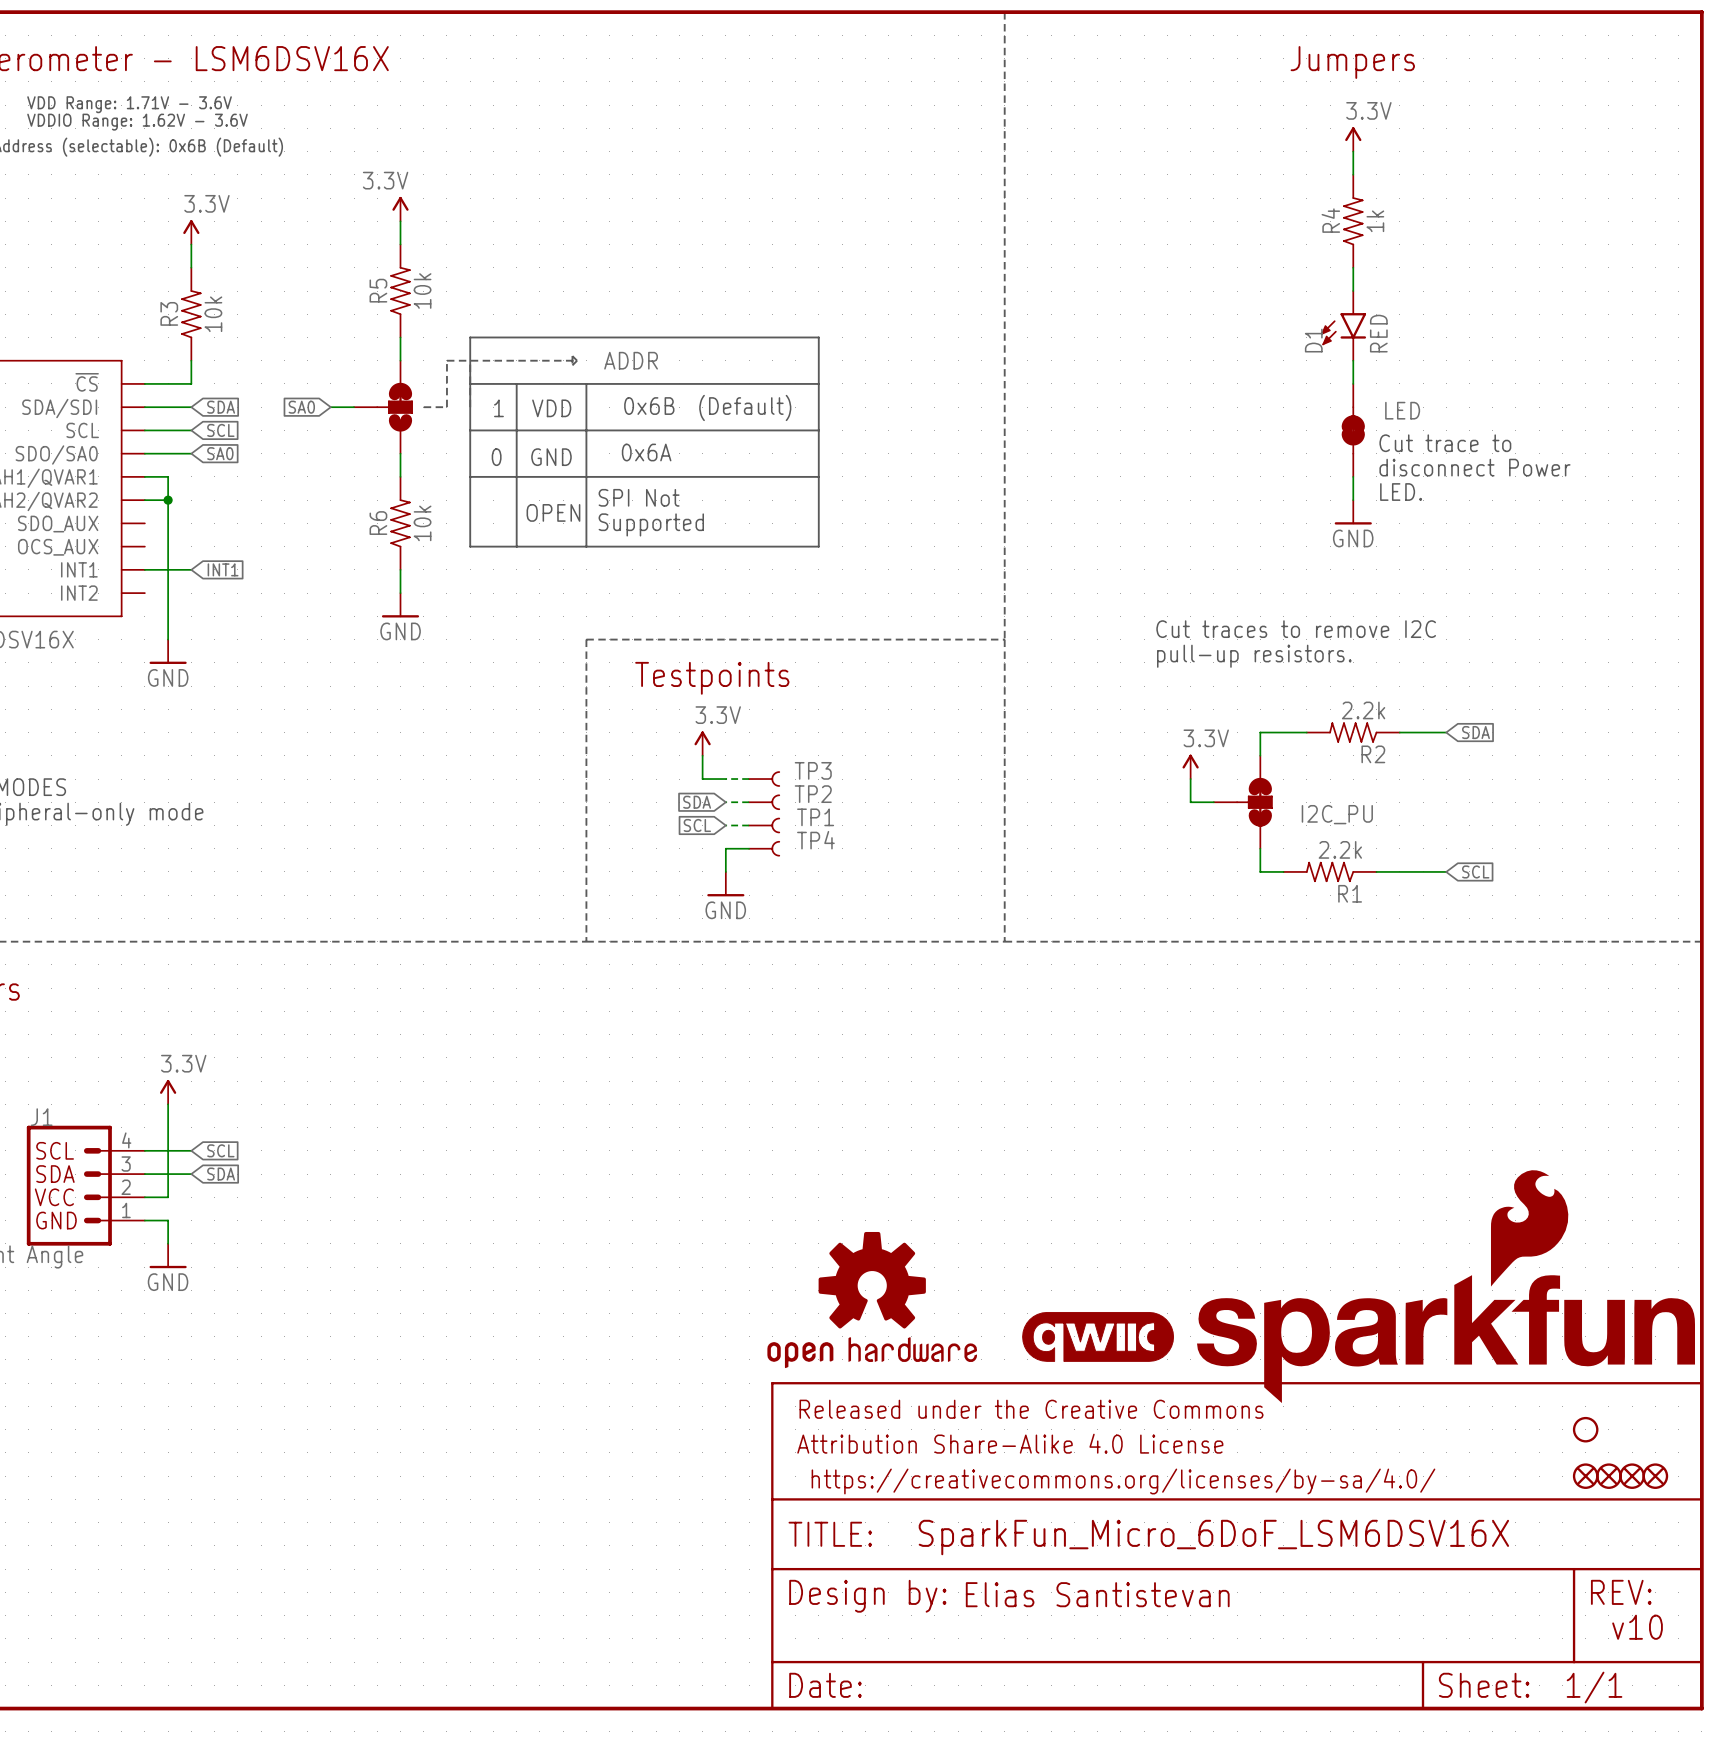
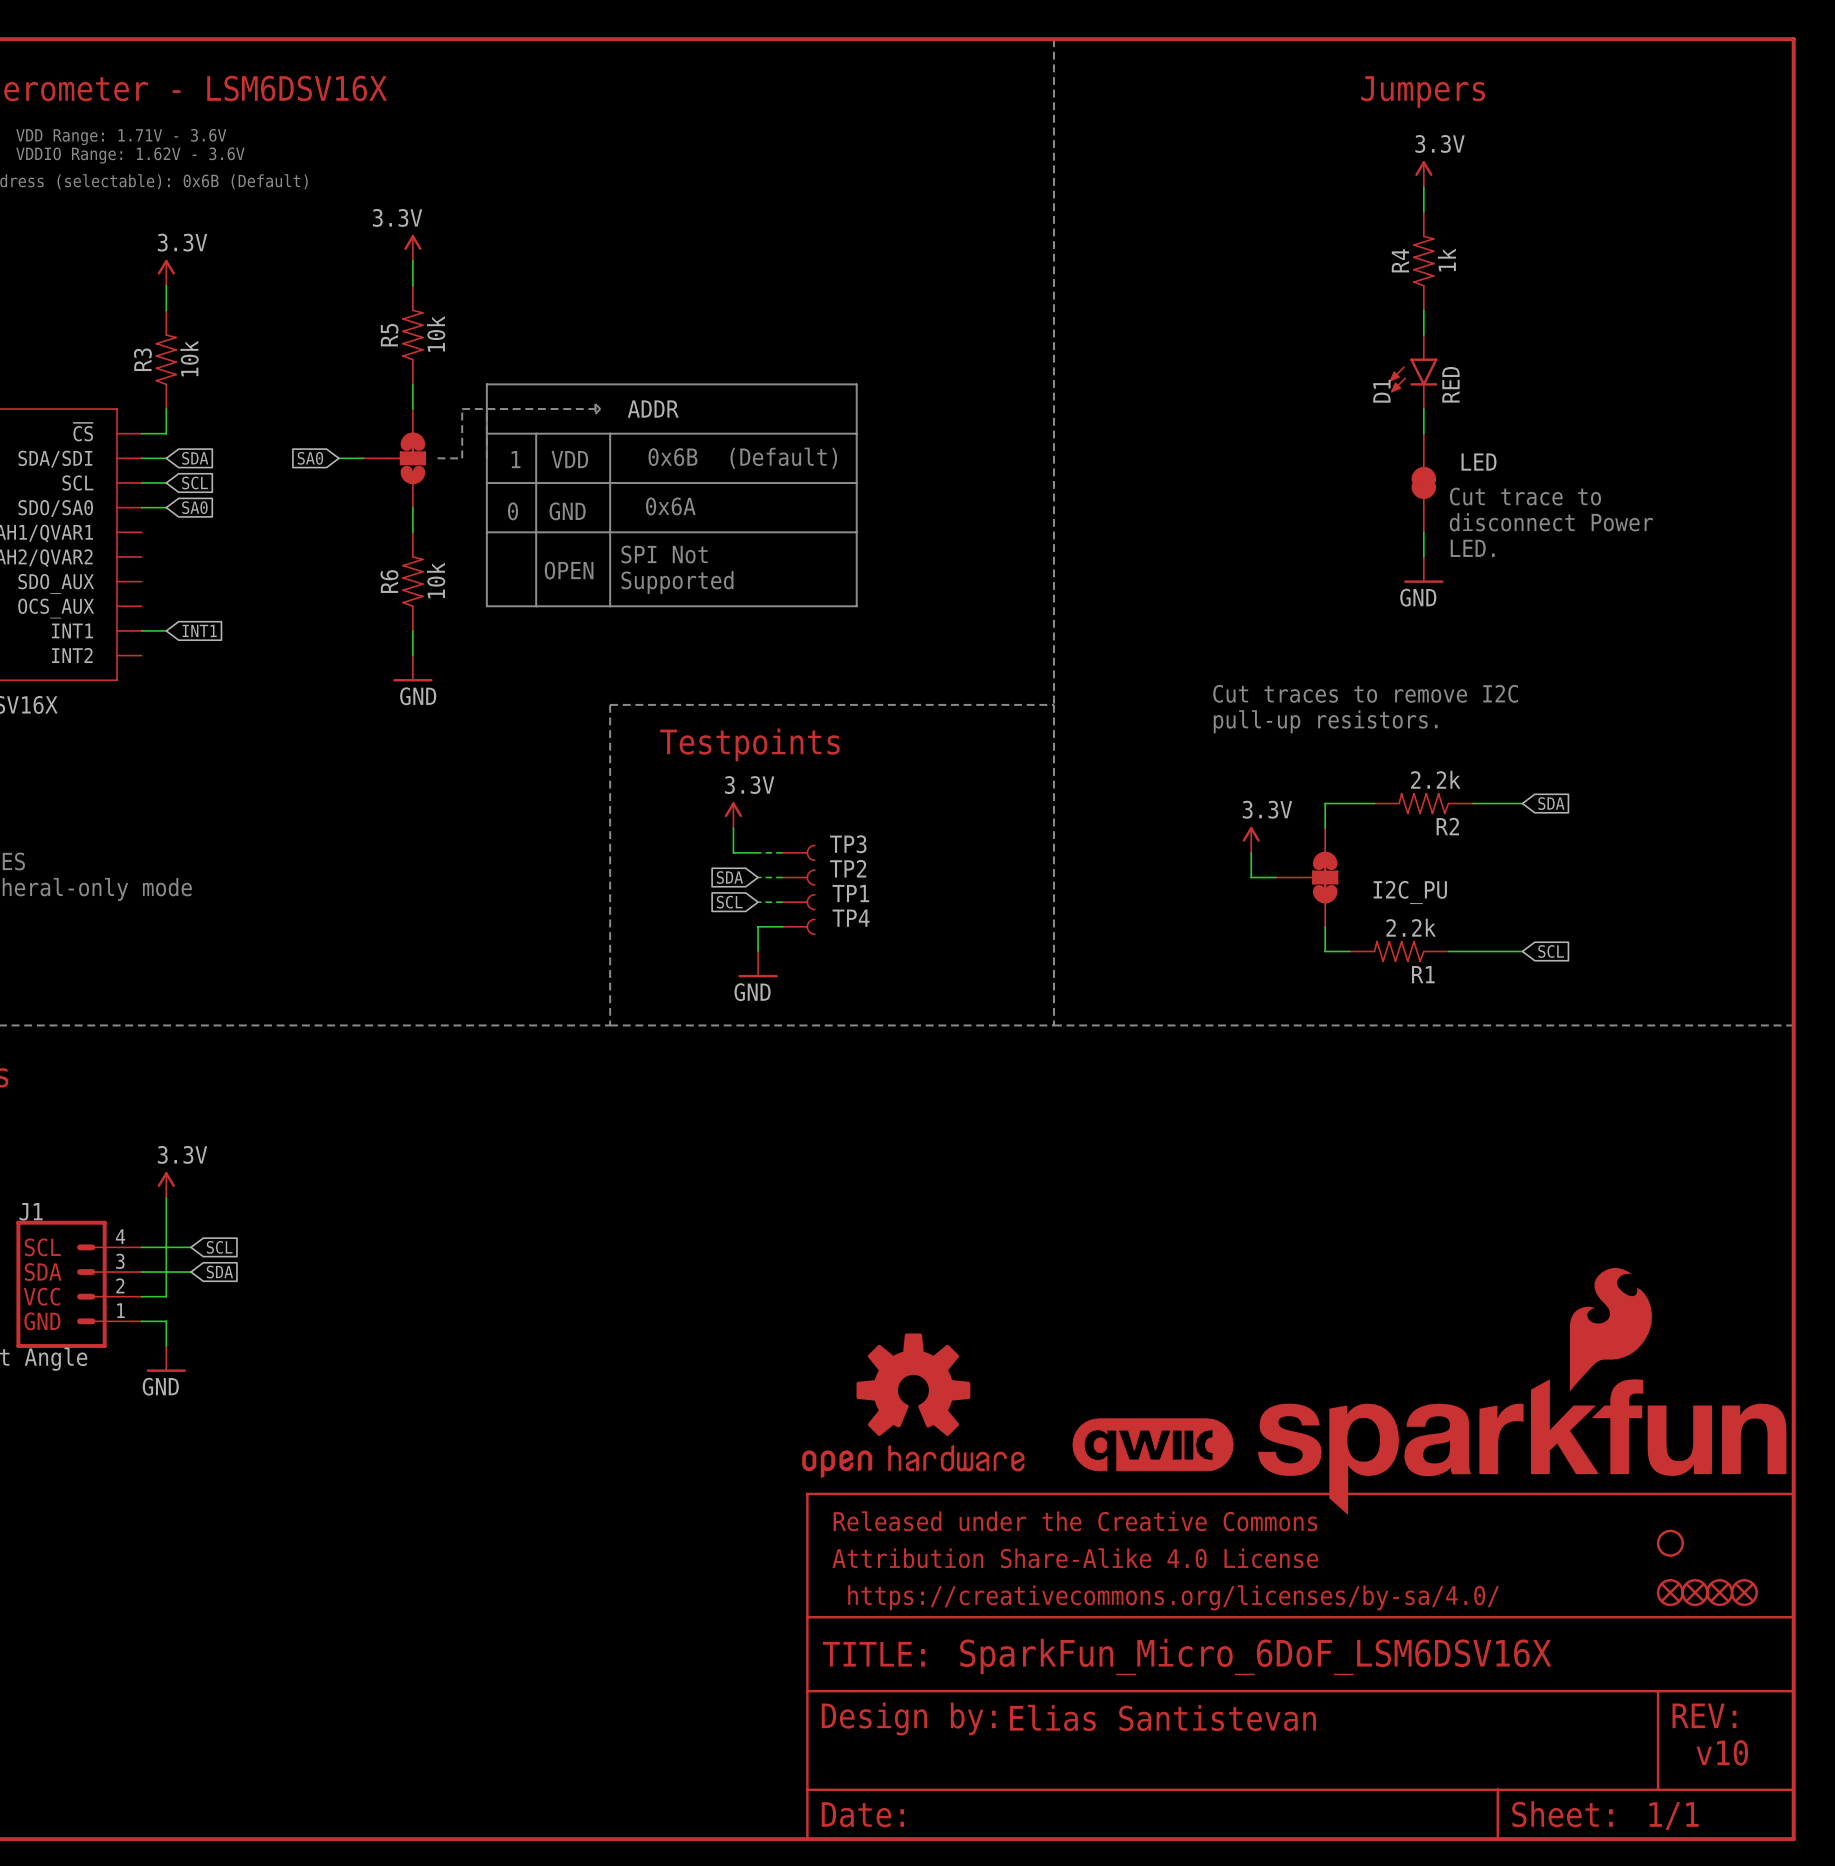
power symbol position: 3.3V (191, 232) -> 3.3V (166, 272)
wire: (191, 244) (191, 267) -> (166, 285) (166, 310)
R3 position: (191, 314) -> (166, 359)
wire: (191, 360) (191, 383) (168, 383) -> (166, 409) (166, 433)
wire: (168, 407) (191, 407) -> none
global label position: SDA (221, 407) -> SDA (195, 458)
wire: (168, 430) (191, 430) -> none
global label position: SCL (220, 430) -> SCL (195, 483)
wire: (168, 453) (191, 453) -> none
global label position: SA0 (220, 453) -> SA0 (194, 507)
wire: (144, 476) (168, 476) (168, 639) -> none
wire: (144, 500) (168, 500) -> none
junction: (168, 500) -> none
wire: (168, 569) (191, 569) -> none
global label position: INT1 (223, 569) -> INT1 (199, 630)
power symbol: GND (168, 651) -> none

